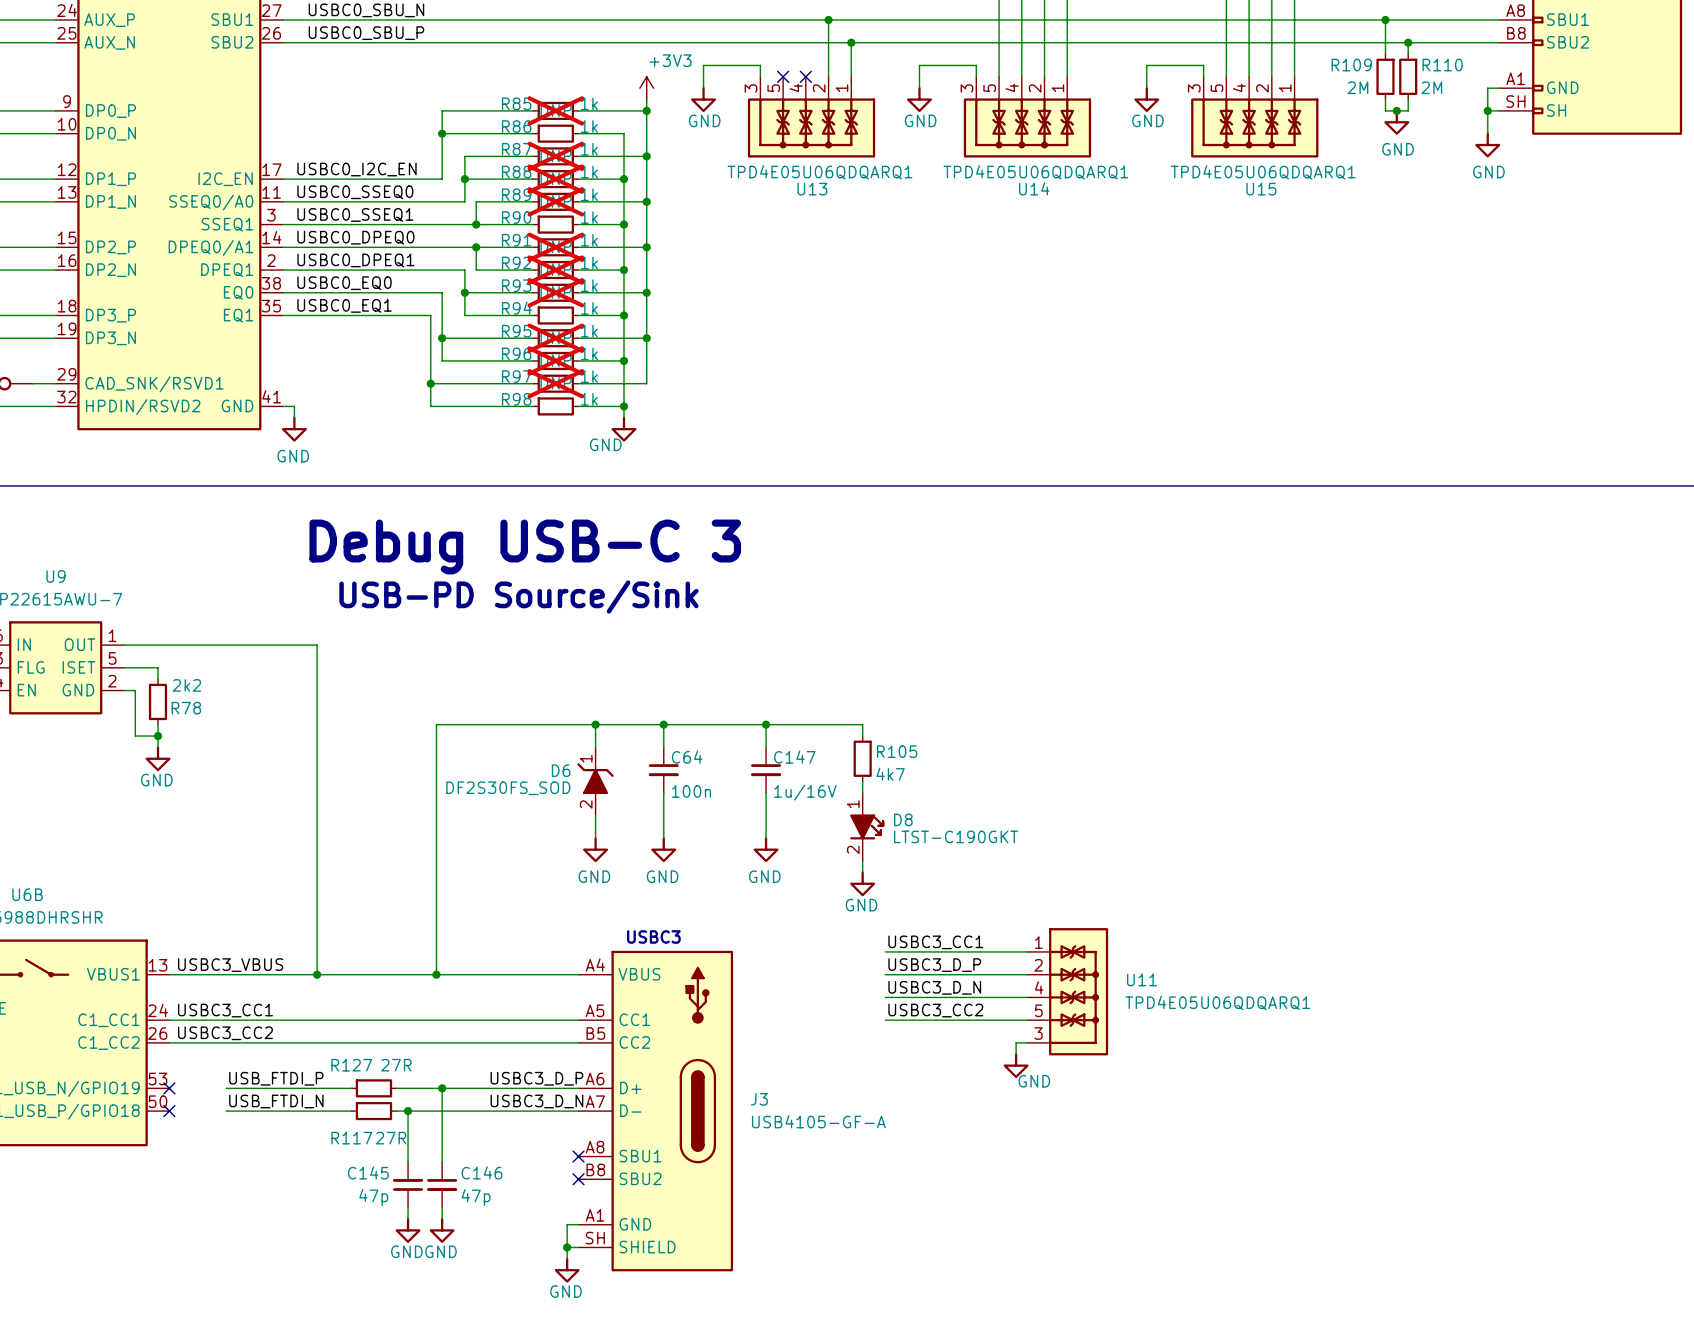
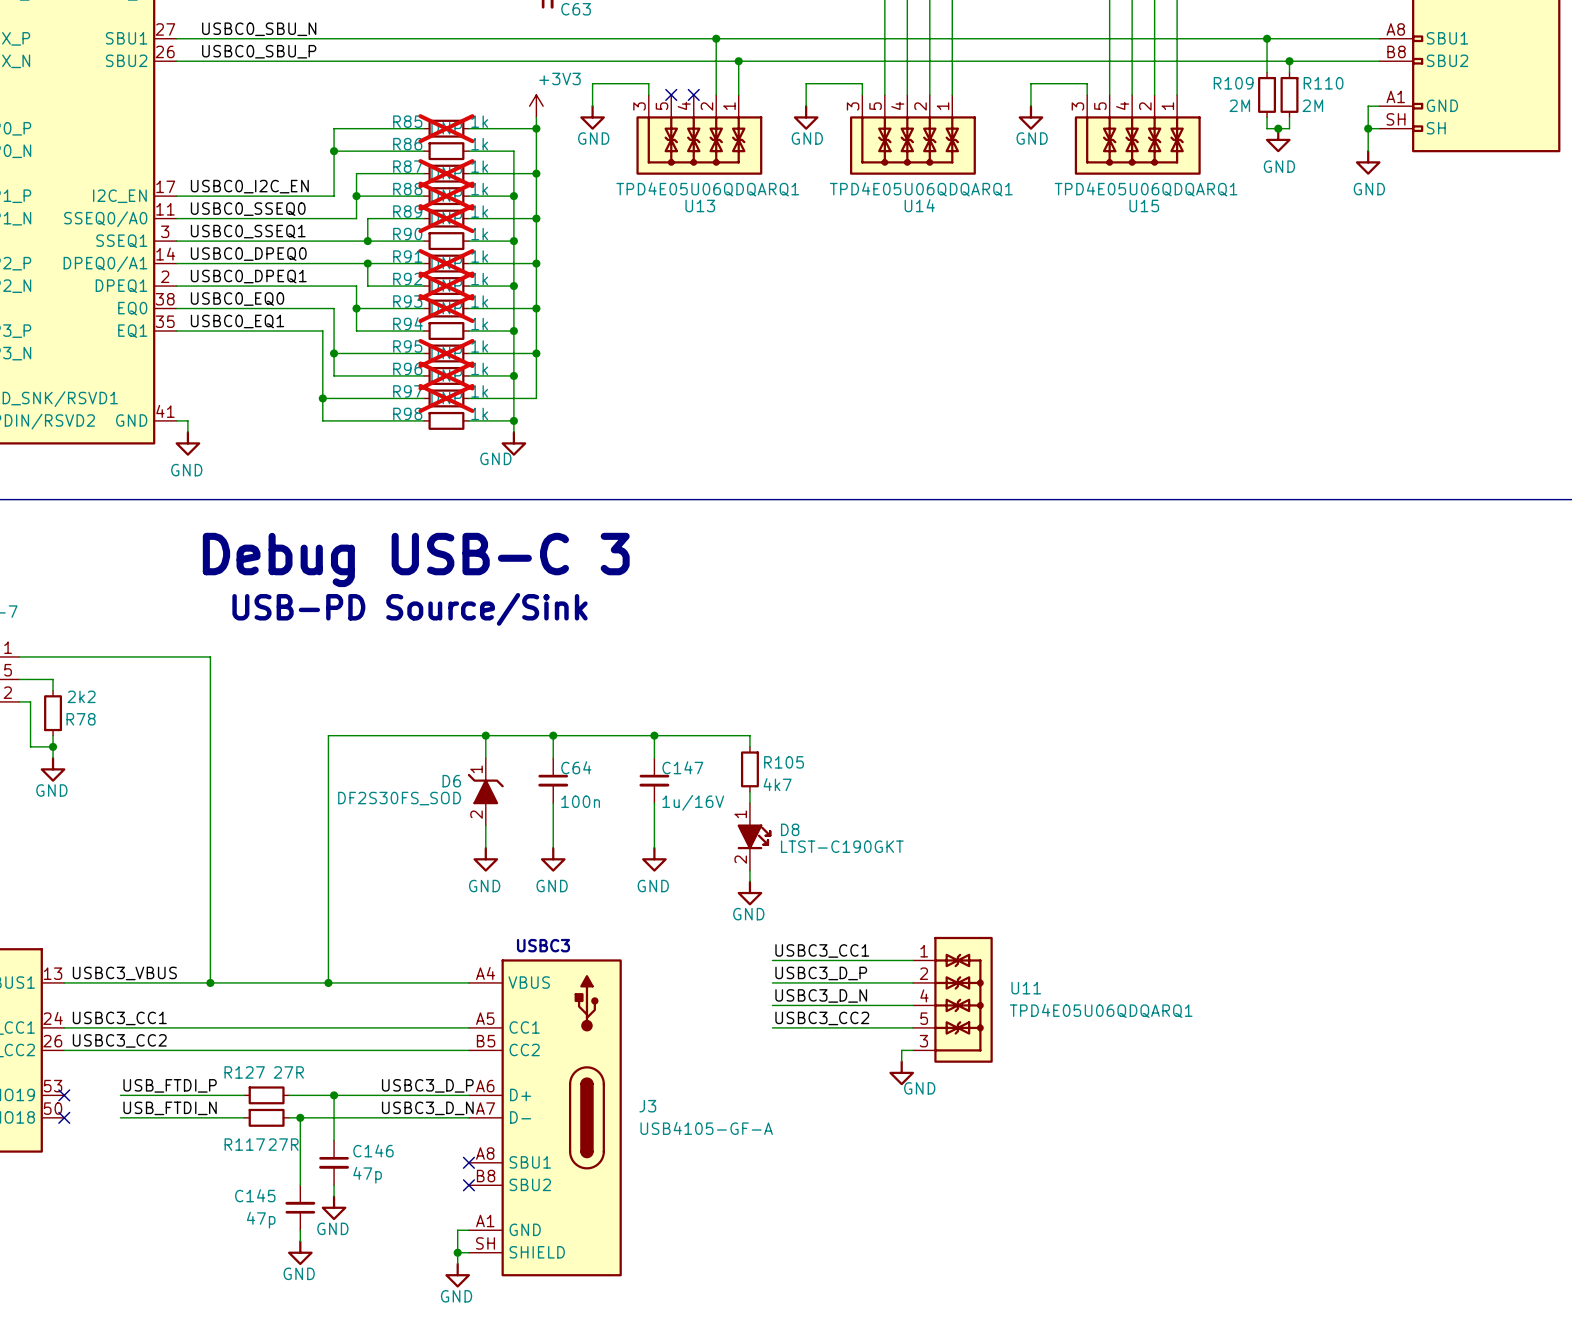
C145 name position: C145 (368, 1172) -> C145 (255, 1195)
C145 position: (408, 1184) -> (300, 1207)
C146 position: (442, 1184) -> (334, 1162)
C145 text position: 47p (373, 1197) -> 47p (261, 1220)
power symbol: none -> GND (334, 1207)
wire: (442, 1207) (442, 1219) -> (334, 1185) (334, 1196)
power symbol position: GND (408, 1230) -> GND (300, 1252)
power symbol: GND (442, 1230) -> none

